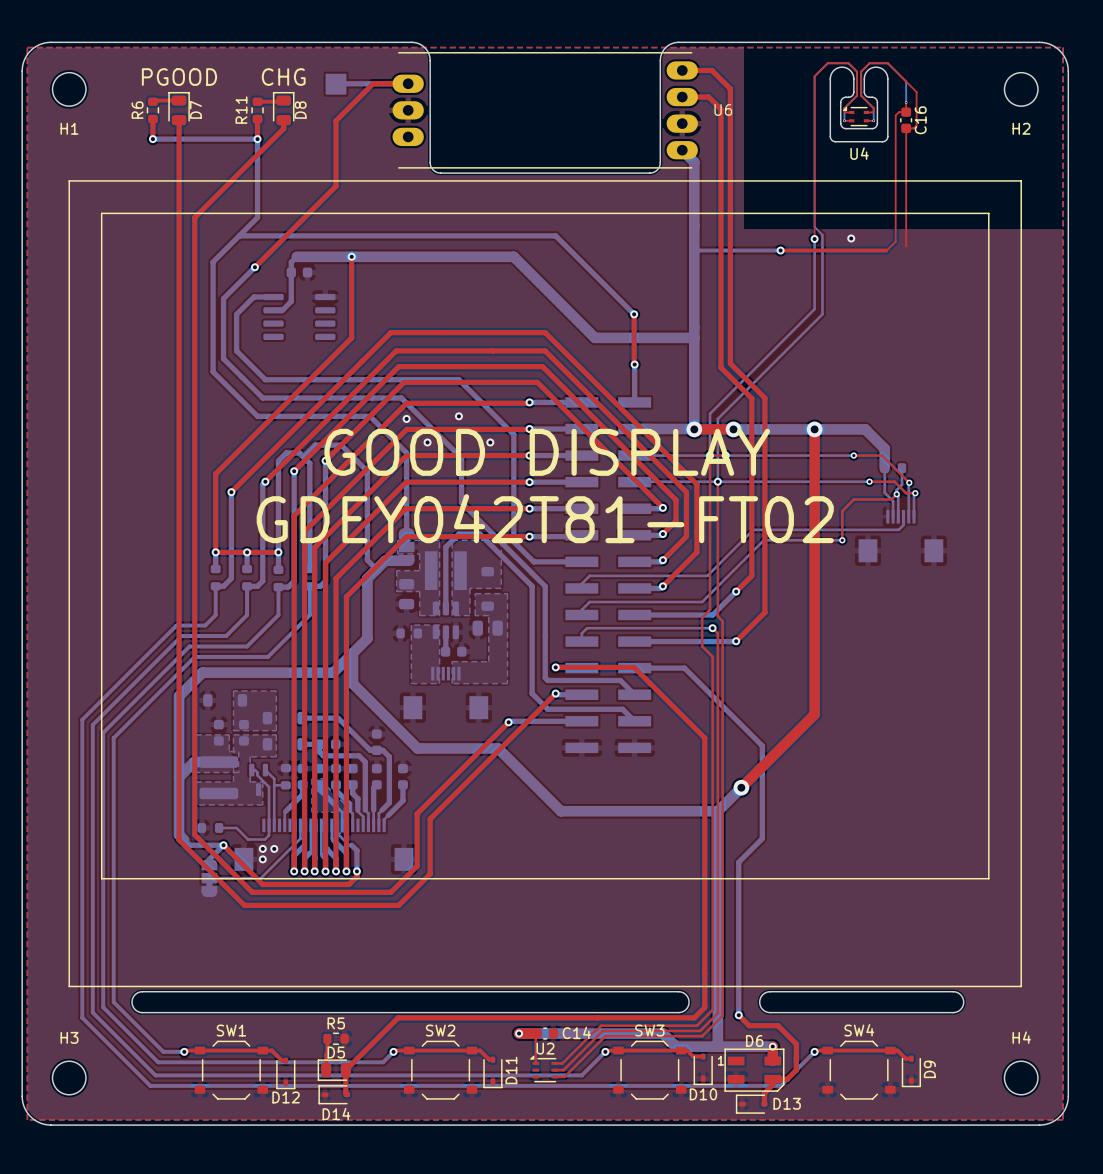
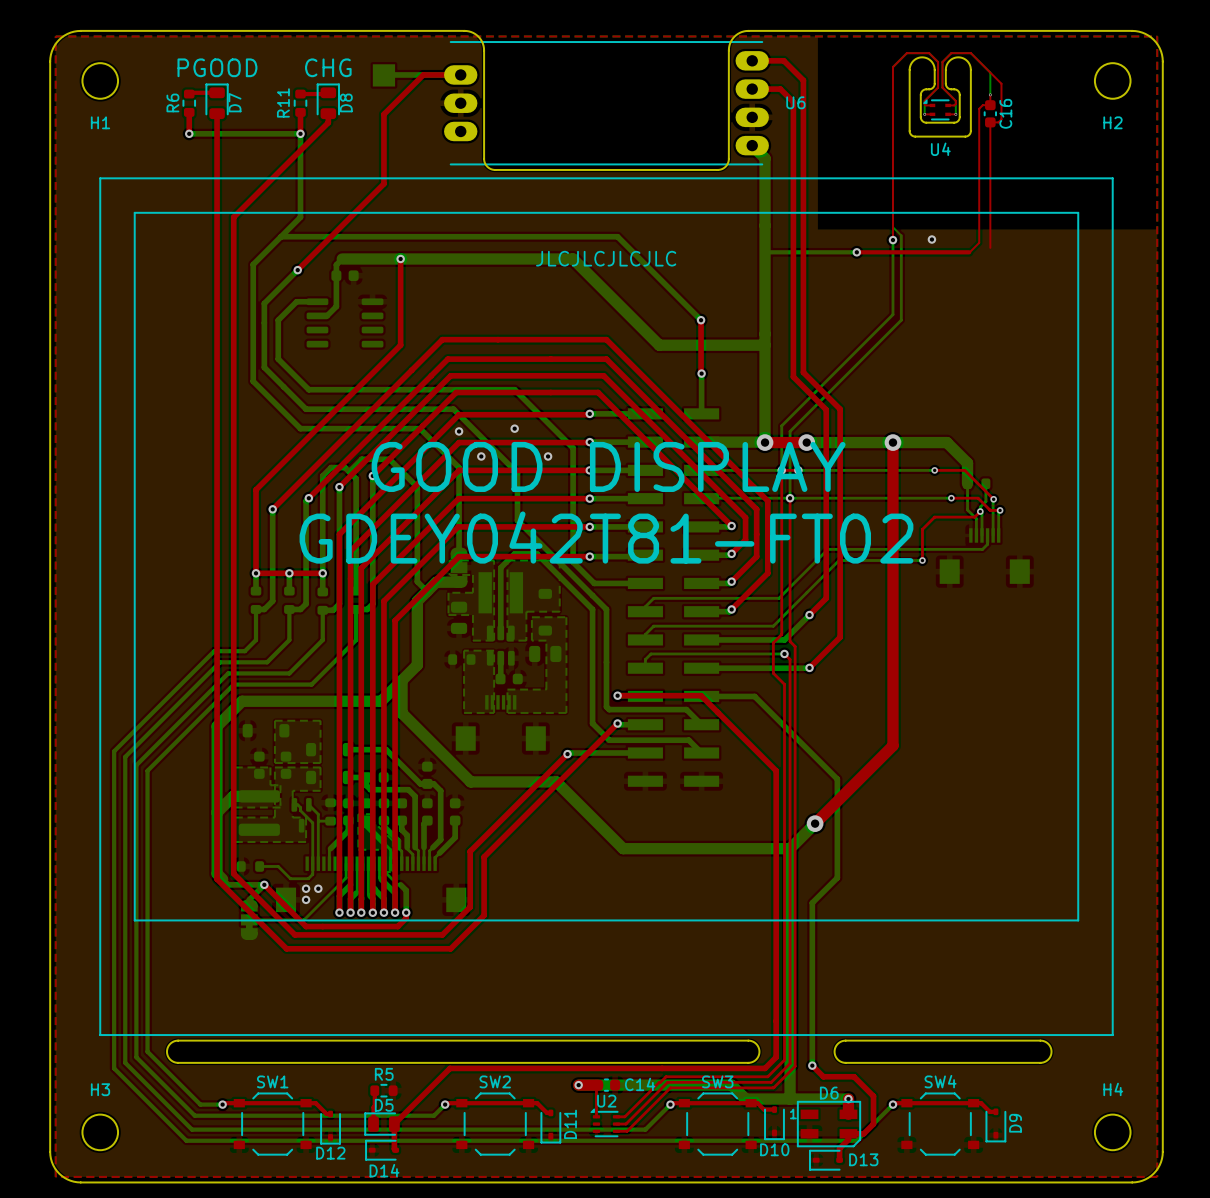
text: none -> JLCJLCJLCJLC (606, 258)

